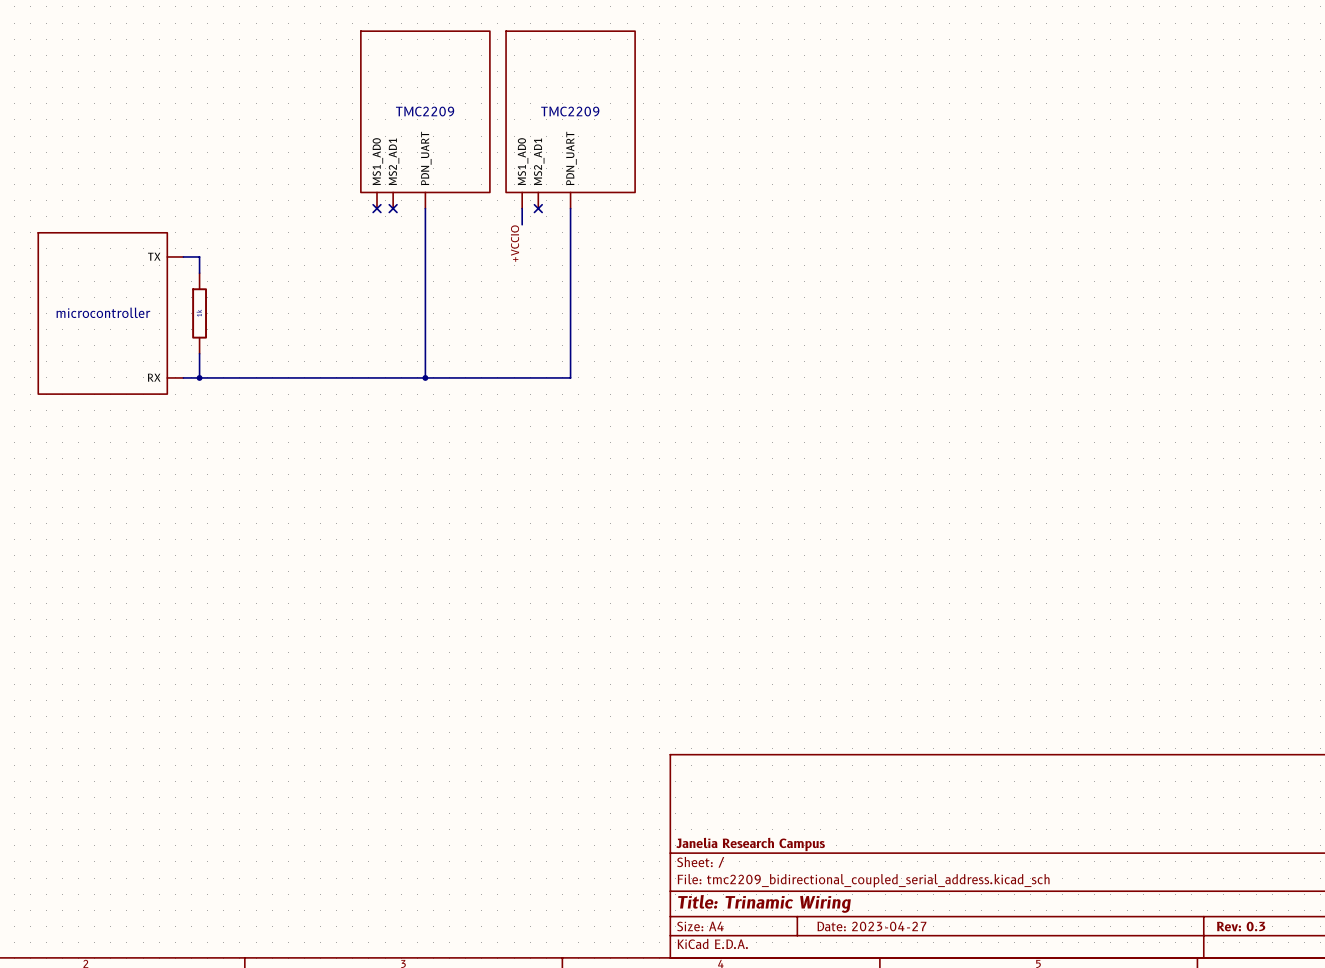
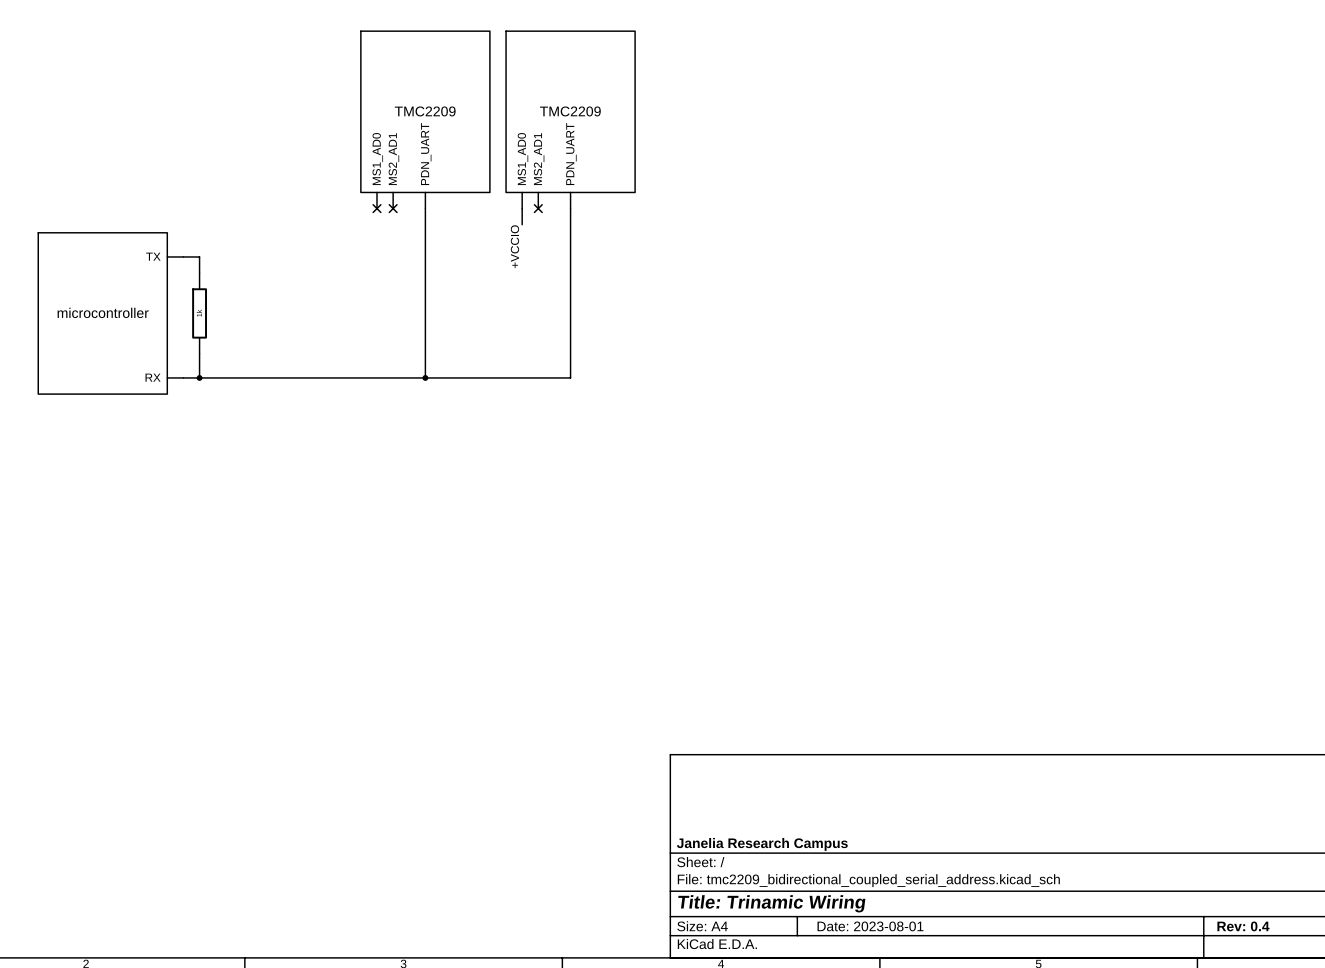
title block: Date: 2023-04-27 (871, 926) -> Date: 2023-08-01 (870, 926)
title block: Rev: 0.3 (1241, 926) -> Rev: 0.4 (1243, 926)

